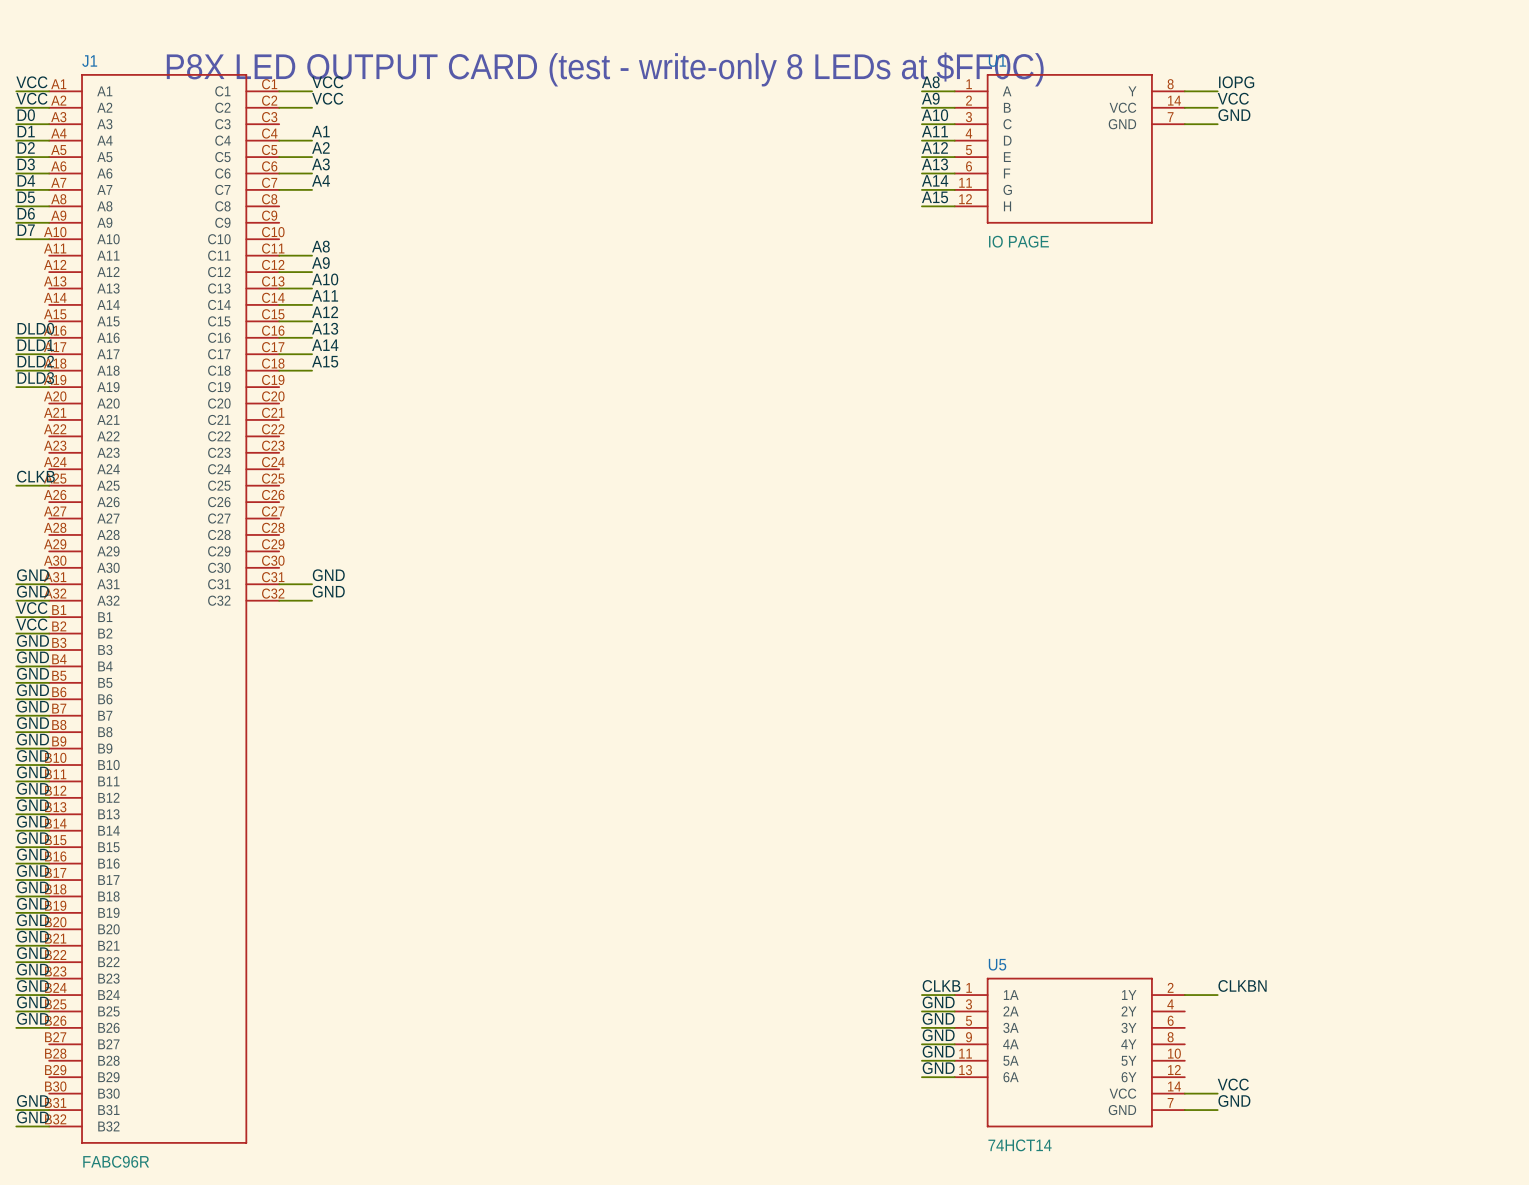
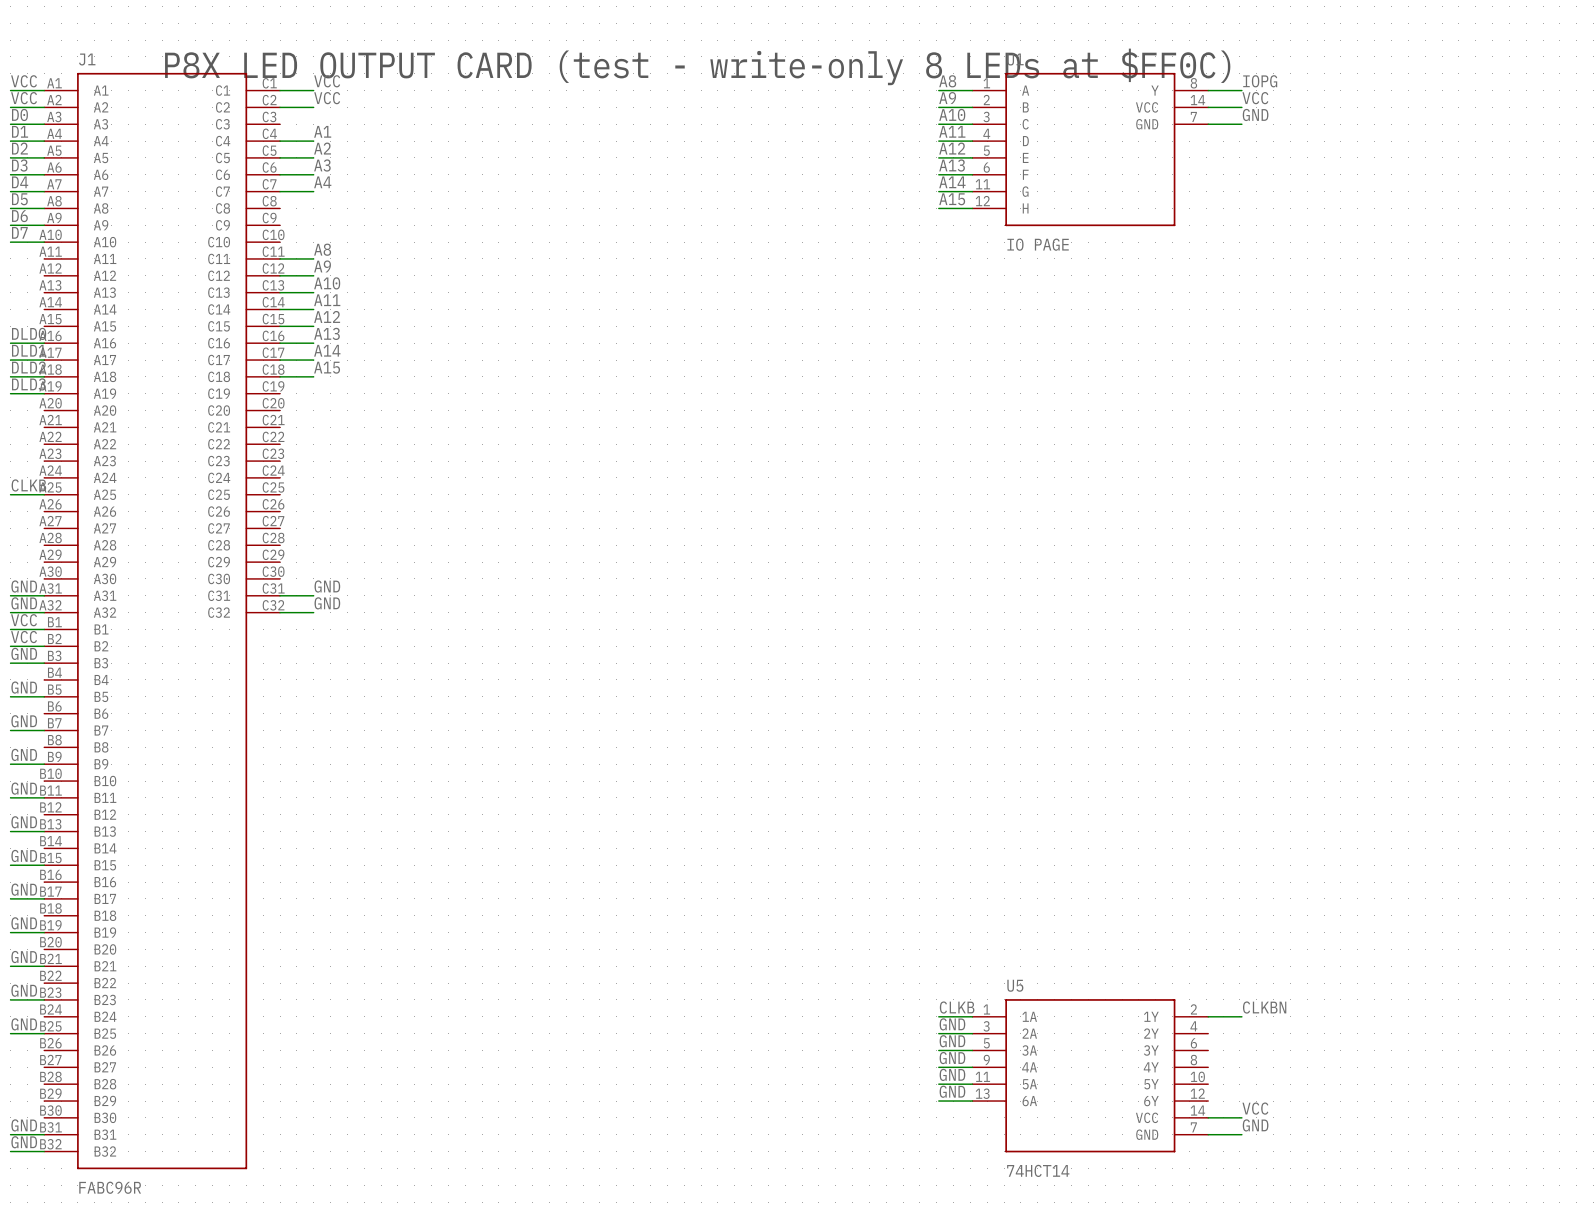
label: GND (33, 657) -> none
wire: (16, 666) (49, 666) -> none
label: GND (33, 690) -> none
wire: (16, 699) (49, 699) -> none
label: GND (33, 723) -> none
wire: (16, 732) (49, 732) -> none
label: GND (33, 755) -> none
wire: (16, 765) (49, 765) -> none
label: GND (33, 788) -> none
wire: (16, 797) (49, 797) -> none
label: GND (33, 821) -> none
wire: (16, 830) (49, 830) -> none
label: GND (33, 854) -> none
wire: (16, 863) (49, 863) -> none
label: GND (33, 887) -> none
wire: (16, 896) (49, 896) -> none
label: GND (33, 920) -> none
wire: (16, 929) (49, 929) -> none
label: GND (33, 953) -> none
wire: (16, 962) (49, 962) -> none
label: GND (33, 985) -> none
wire: (16, 995) (49, 995) -> none
label: GND (33, 1018) -> none
wire: (16, 1027) (49, 1027) -> none

